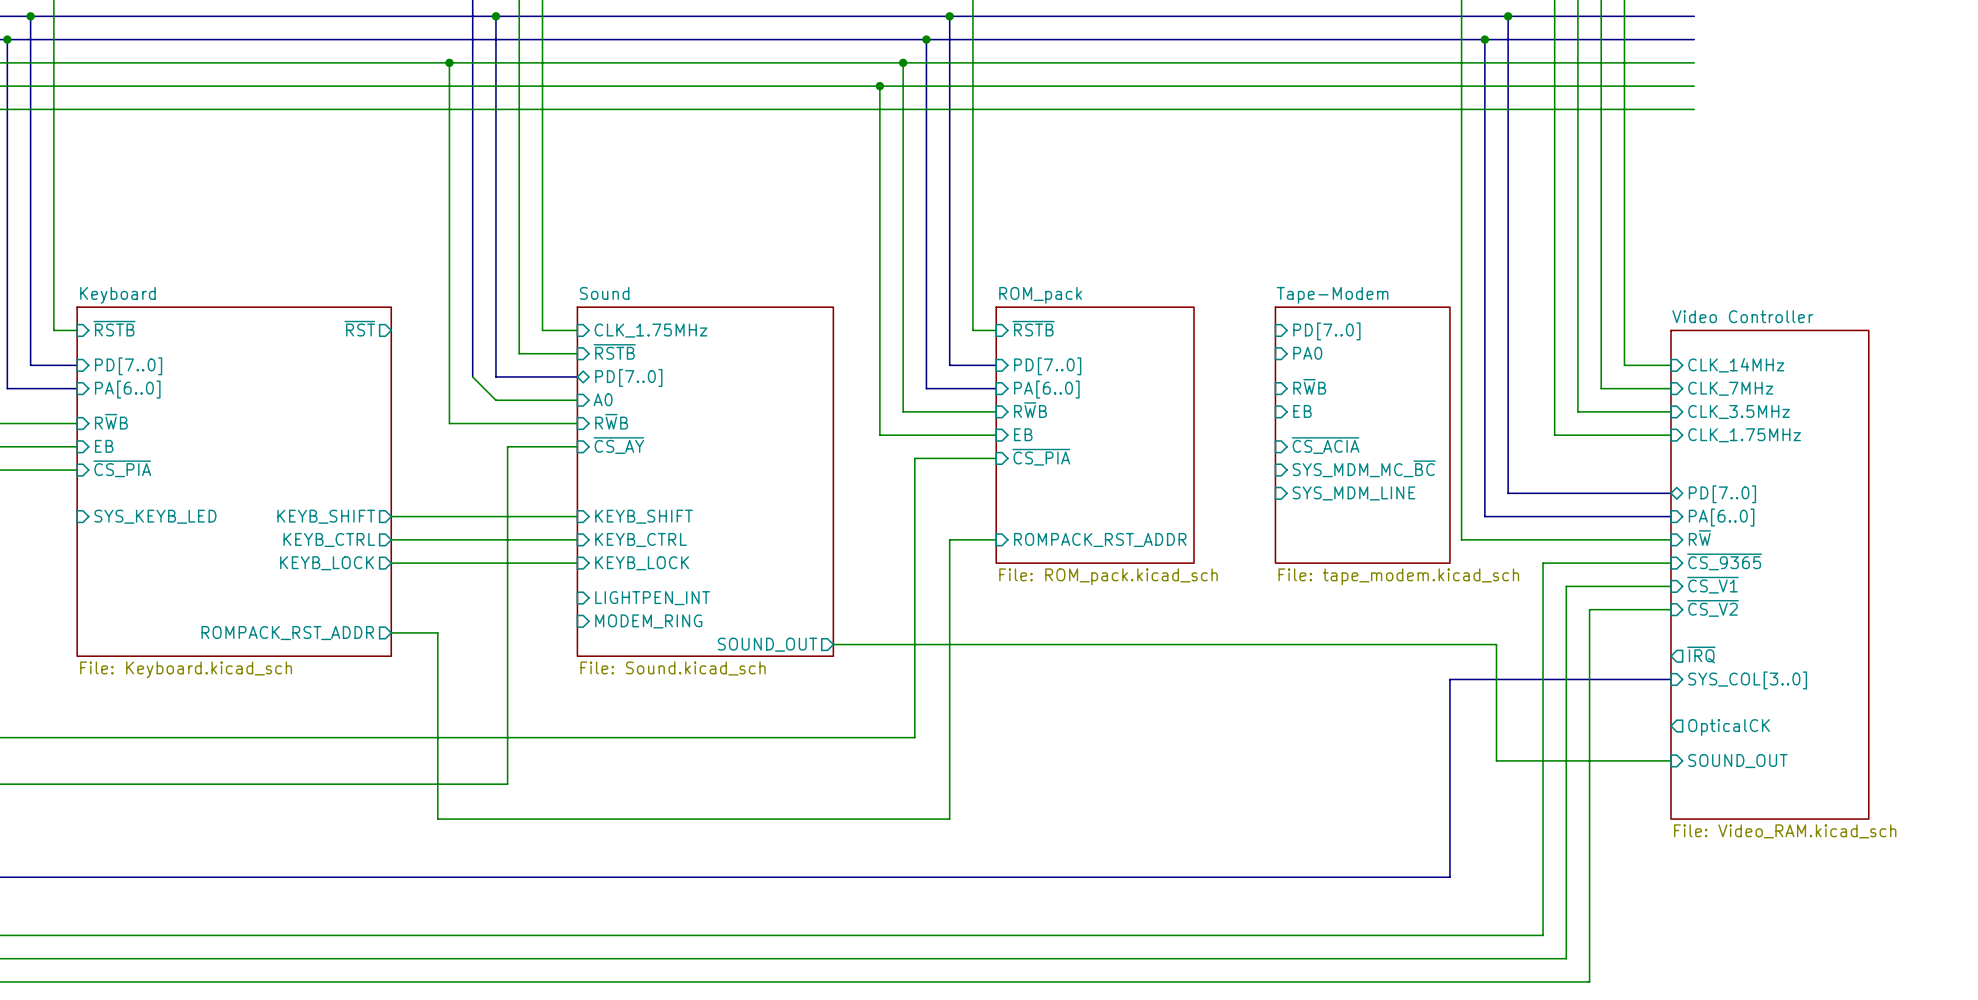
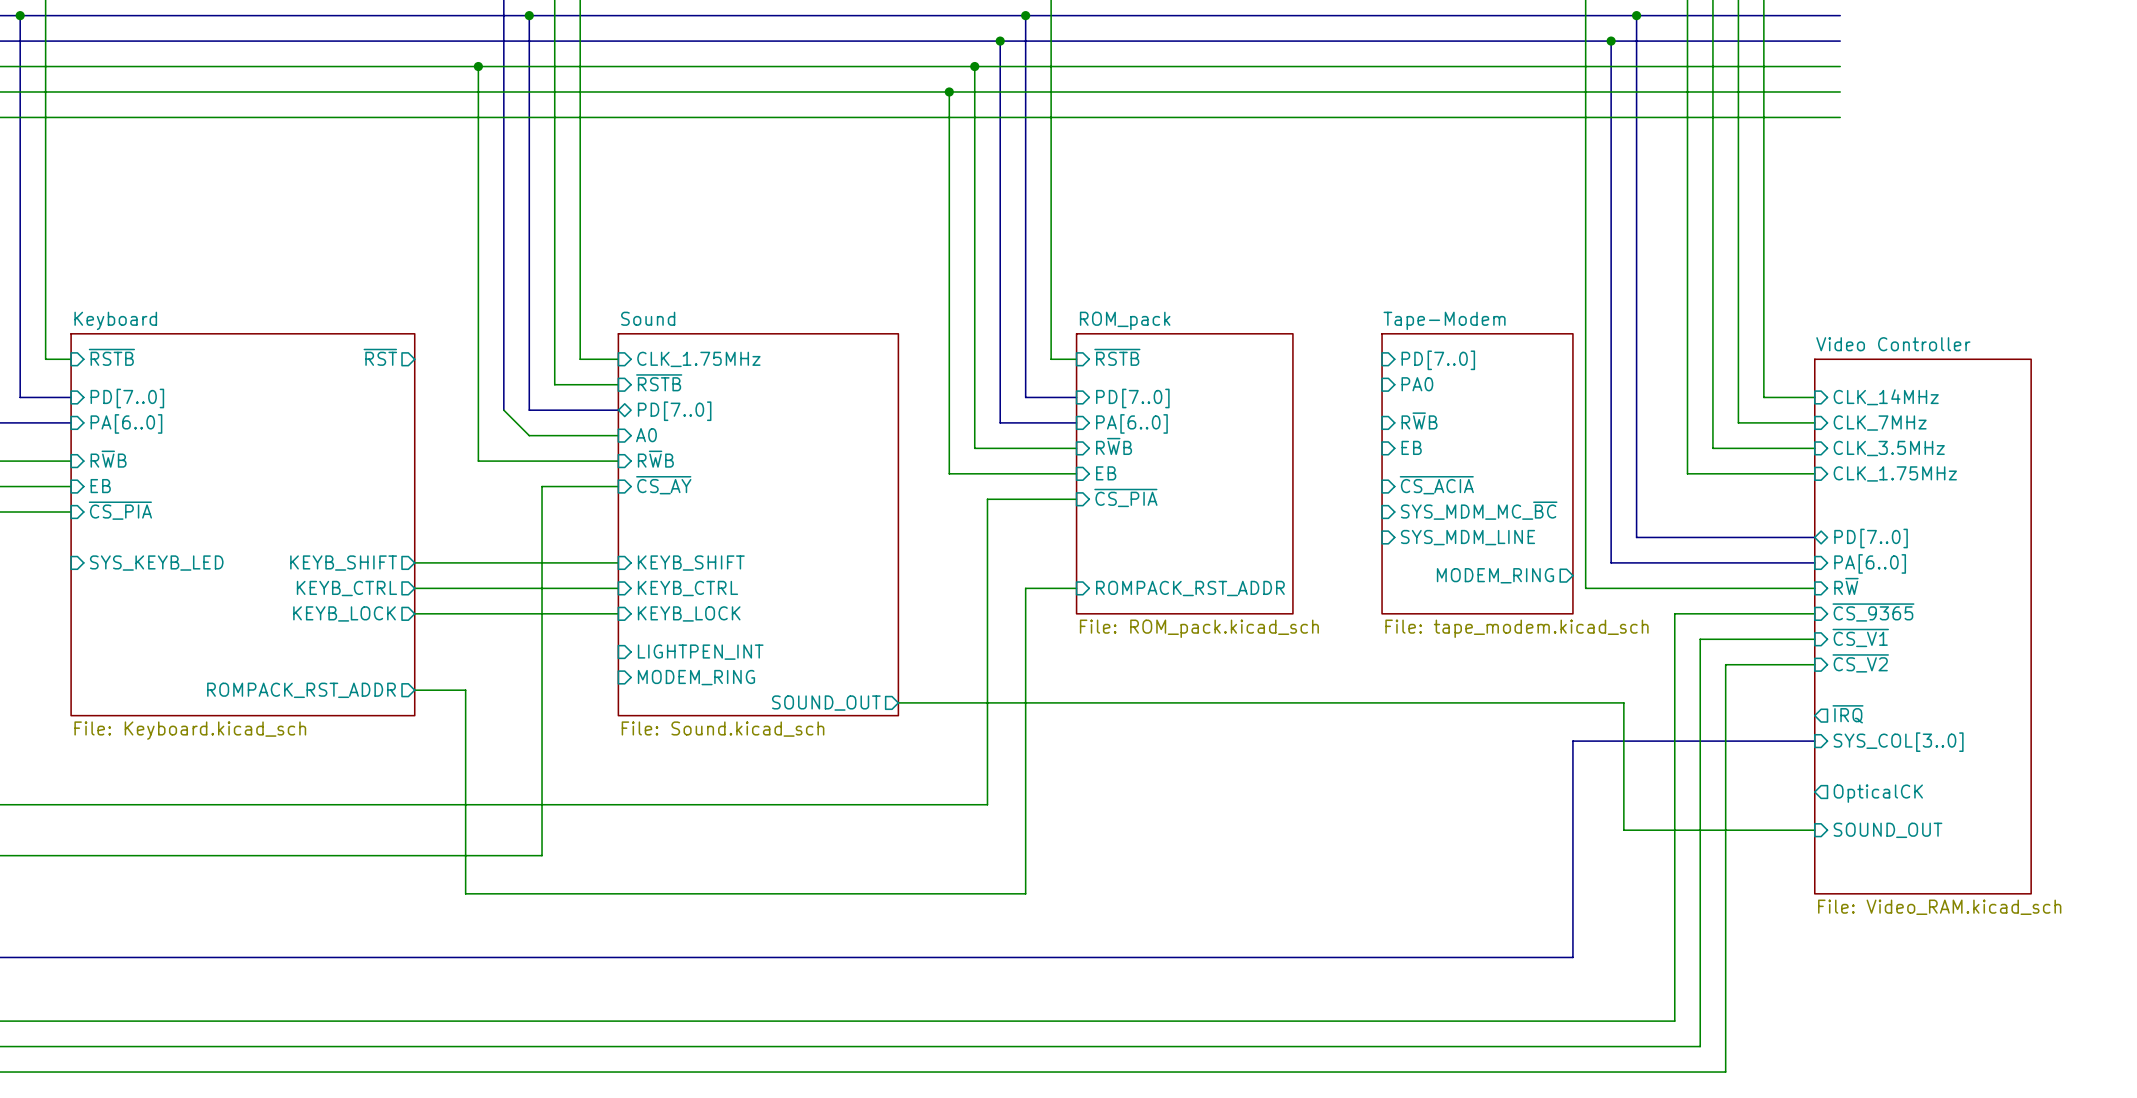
sheet pin: none -> MODEM_RING (1495, 575)

